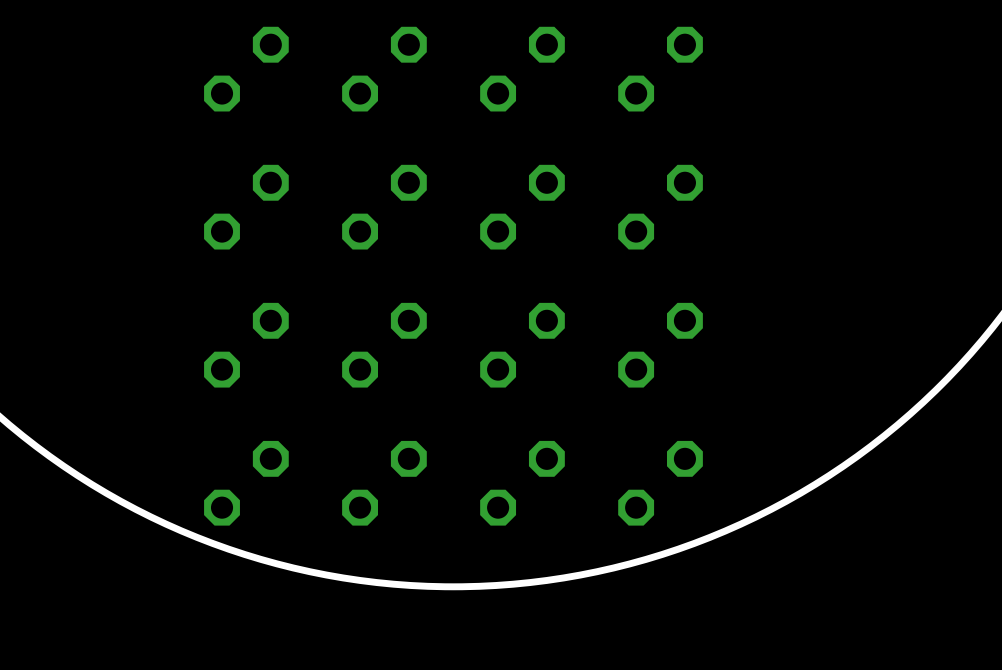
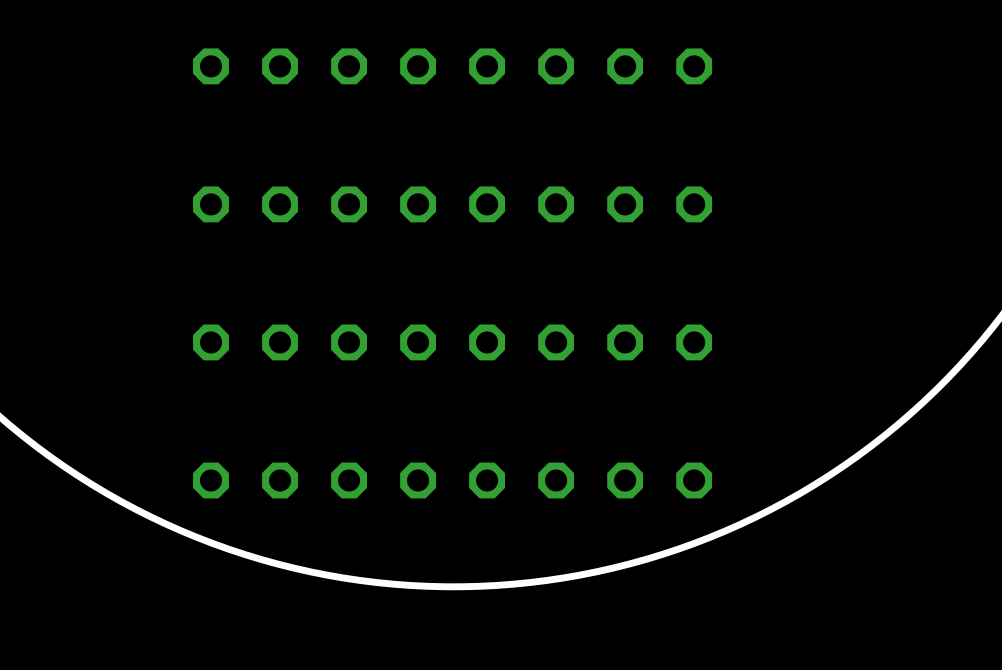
part rotation: 0° (246, 69) -> 45° clockwise (245, 66)
part rotation: 0° (384, 69) -> 45° clockwise (383, 66)
part rotation: 0° (522, 69) -> 45° clockwise (521, 66)
part rotation: 0° (660, 69) -> 45° clockwise (659, 66)
part rotation: 0° (246, 207) -> 45° clockwise (245, 204)
part rotation: 0° (384, 207) -> 45° clockwise (383, 204)
part rotation: 0° (522, 207) -> 45° clockwise (521, 204)
part rotation: 0° (660, 207) -> 45° clockwise (659, 204)
part rotation: 0° (246, 345) -> 45° clockwise (245, 342)
part rotation: 0° (384, 345) -> 45° clockwise (383, 342)
part rotation: 0° (522, 345) -> 45° clockwise (521, 342)
part rotation: 0° (660, 345) -> 45° clockwise (659, 342)
part rotation: 0° (246, 483) -> 45° clockwise (245, 480)
part rotation: 0° (384, 483) -> 45° clockwise (383, 480)
part rotation: 0° (522, 483) -> 45° clockwise (521, 480)
part rotation: 0° (660, 483) -> 45° clockwise (659, 480)

